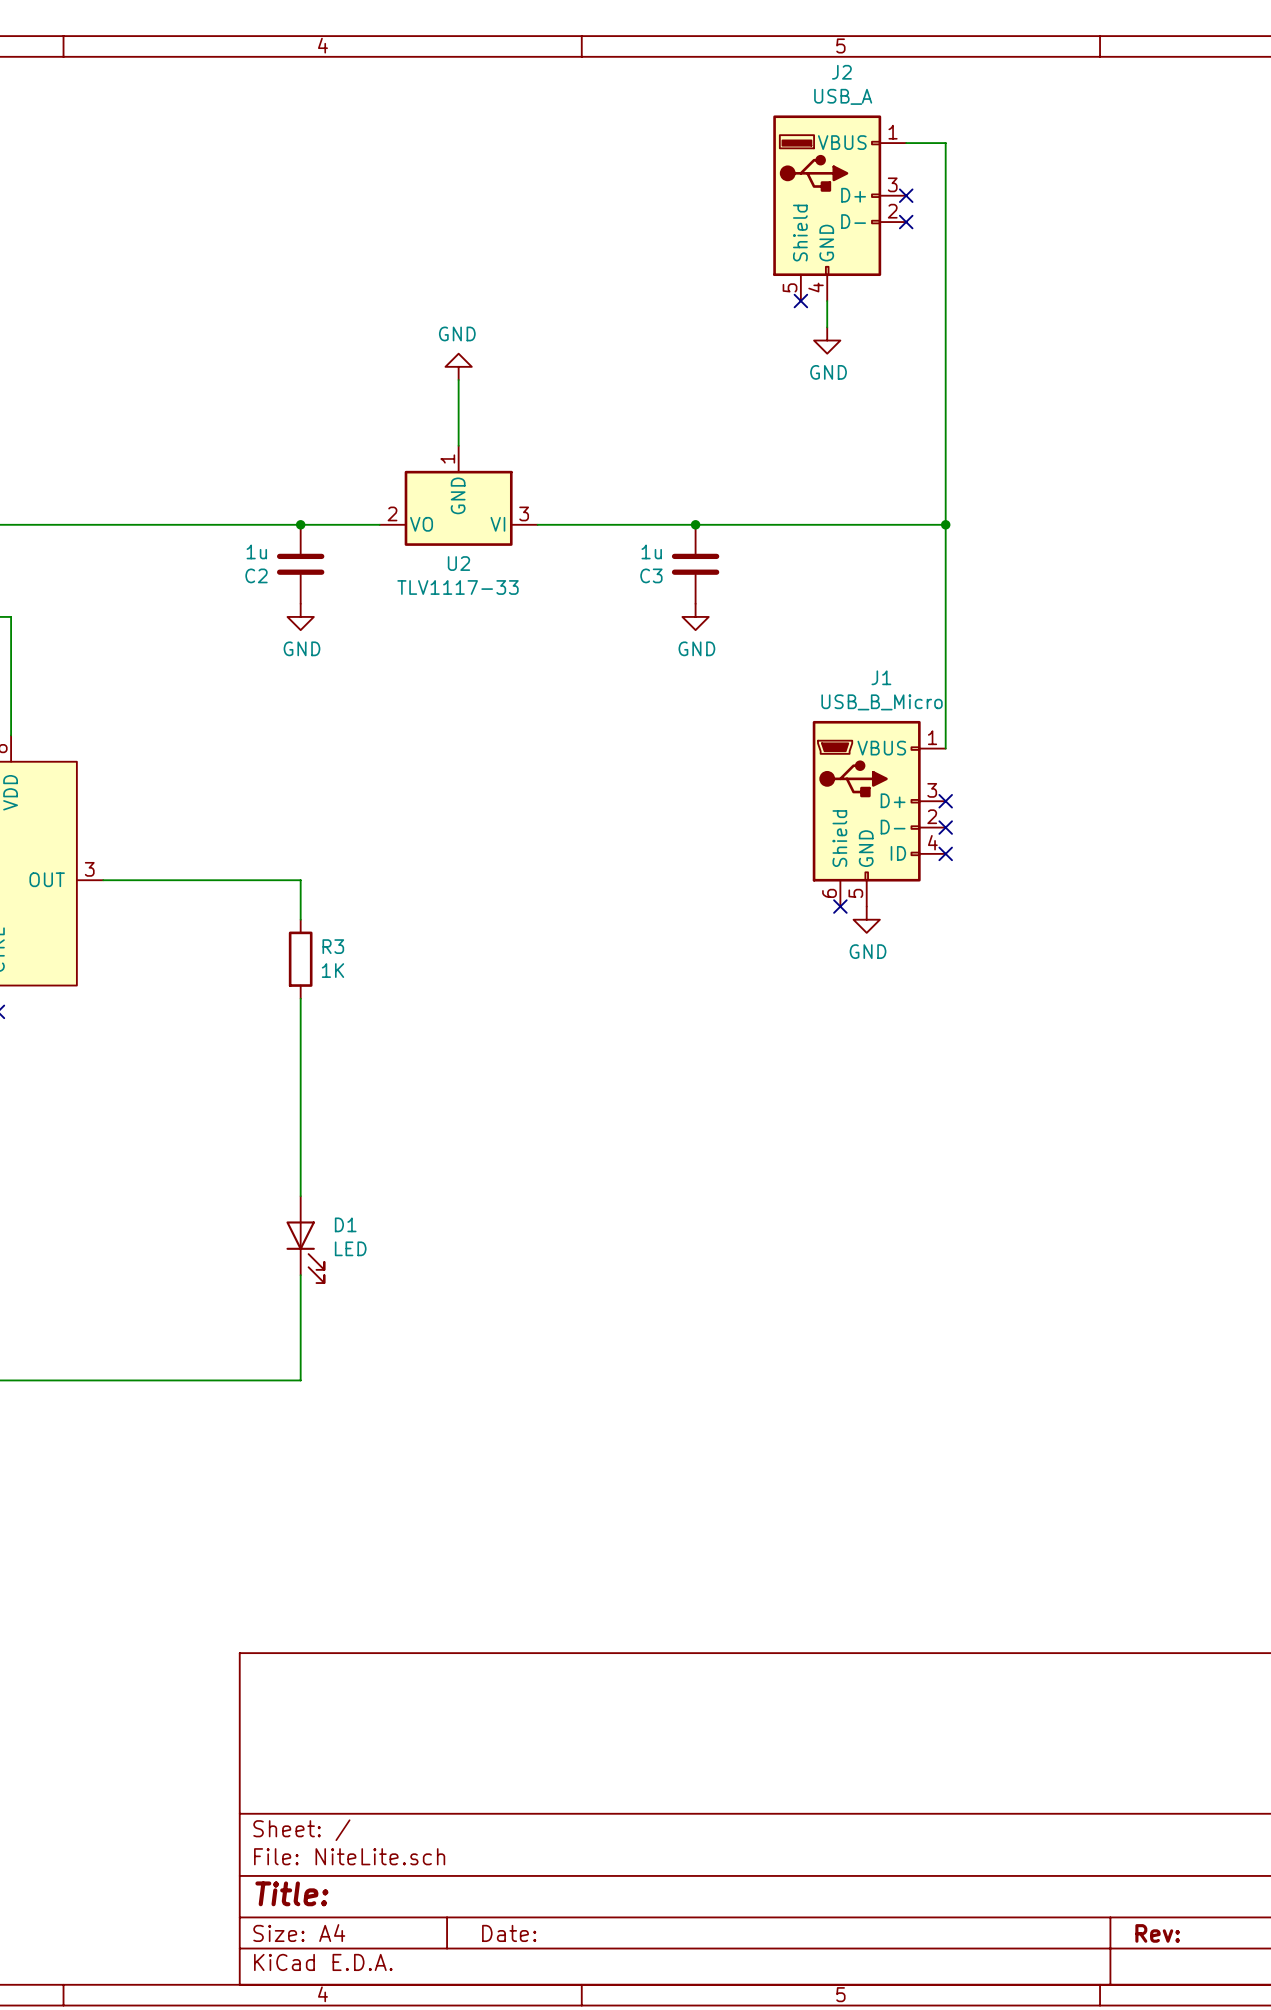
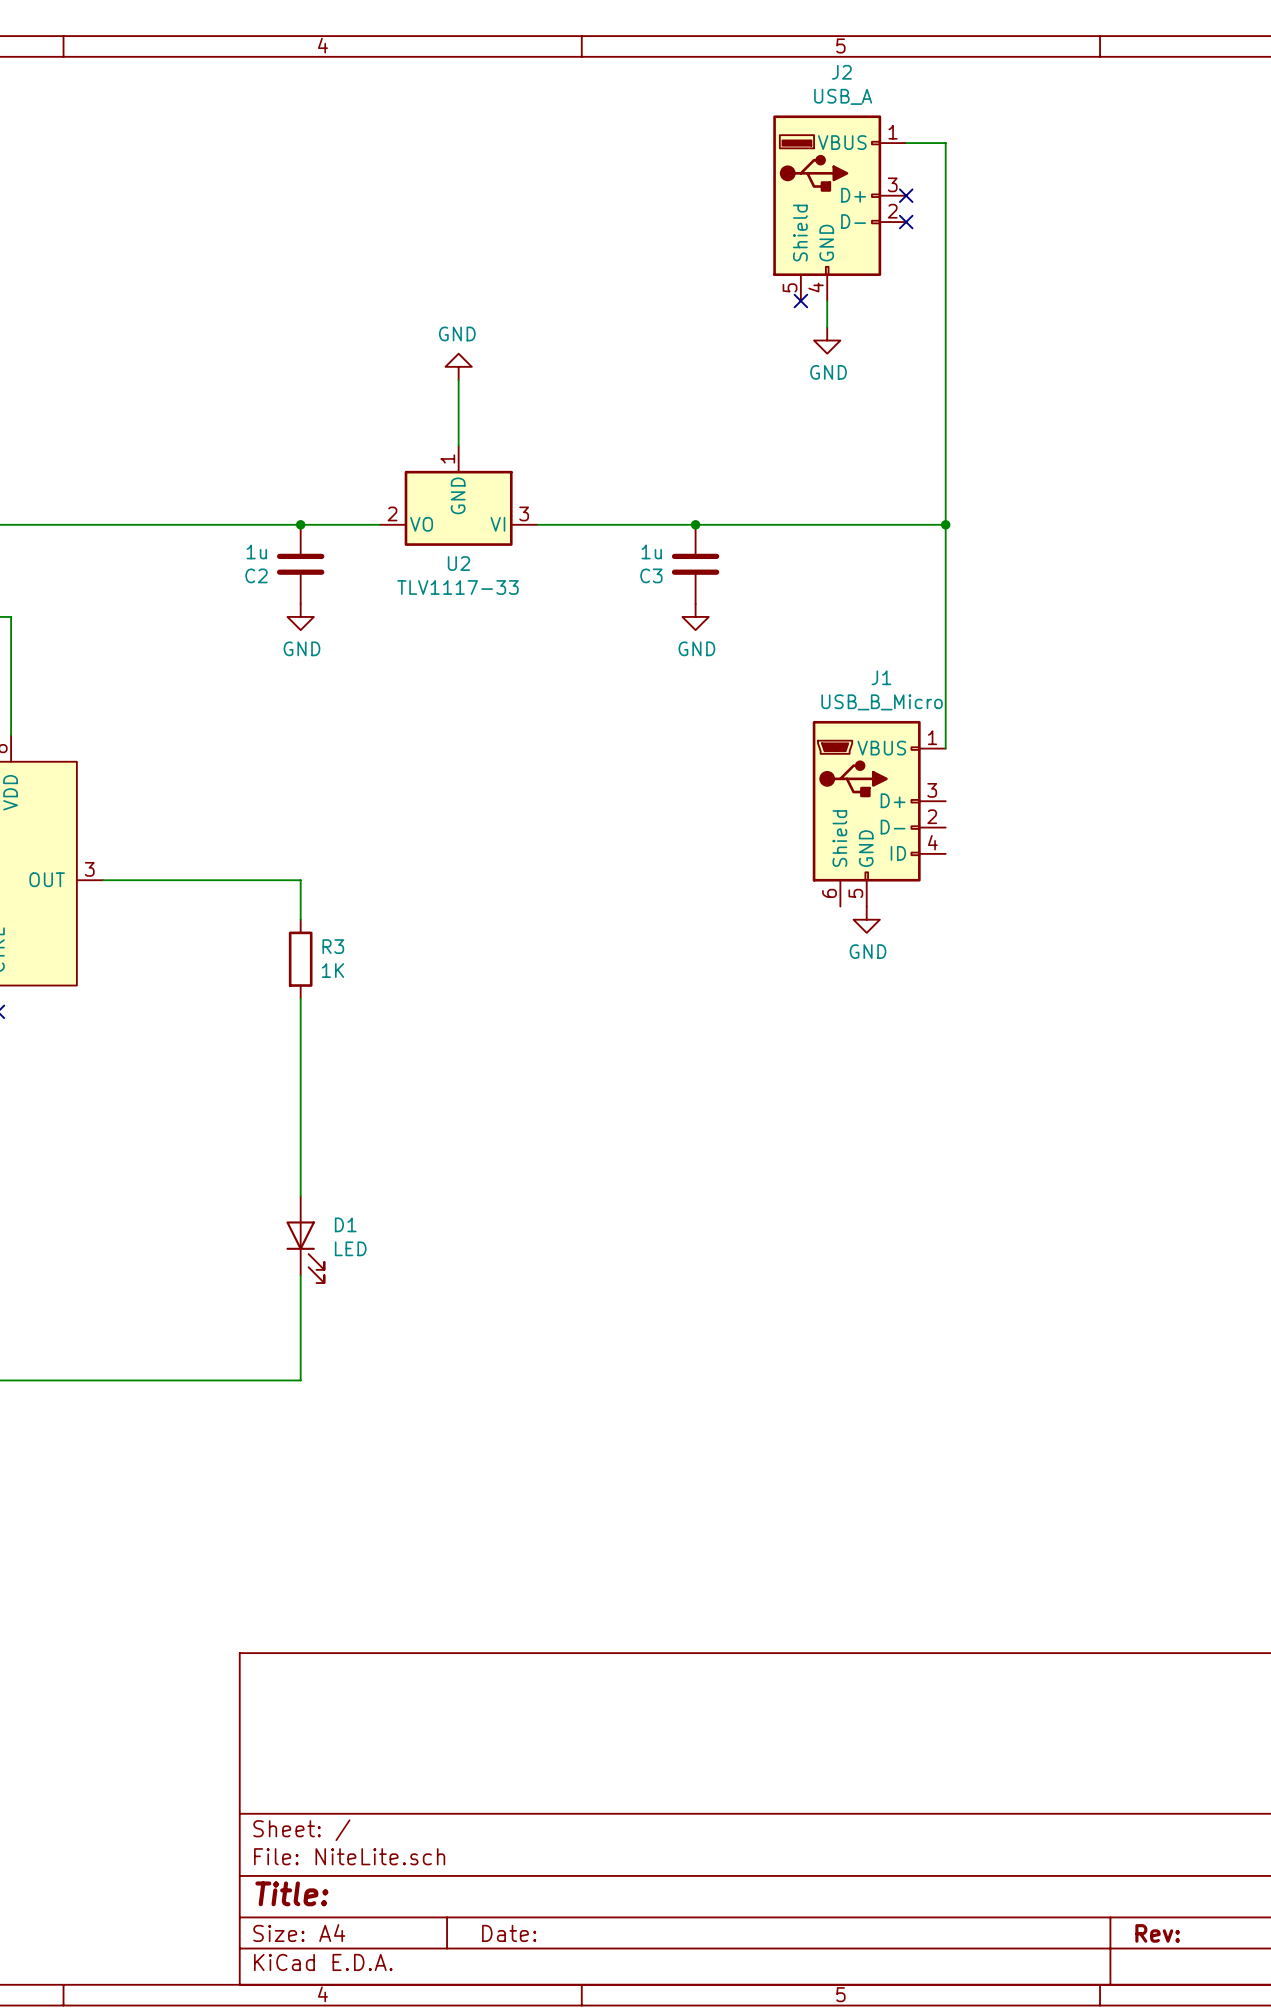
no-connect mark: (945, 801) -> none
no-connect mark: (945, 827) -> none
no-connect mark: (945, 853) -> none
no-connect mark: (840, 906) -> none

